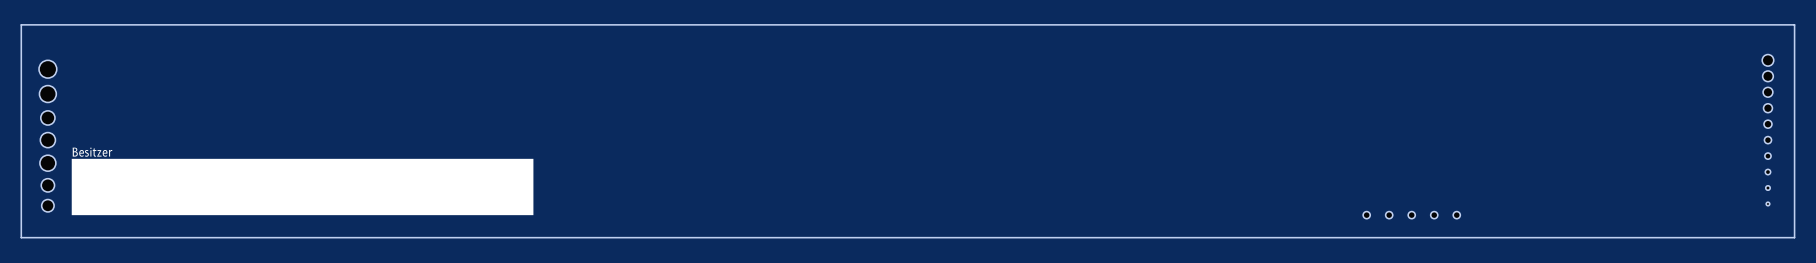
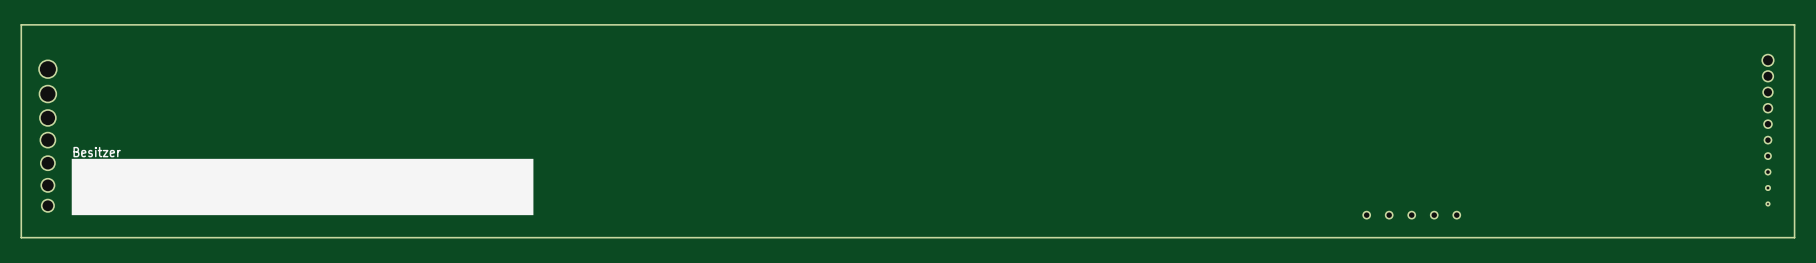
hole position: (47, 117) -> (47, 163)
hole position: (47, 163) -> (47, 117)

